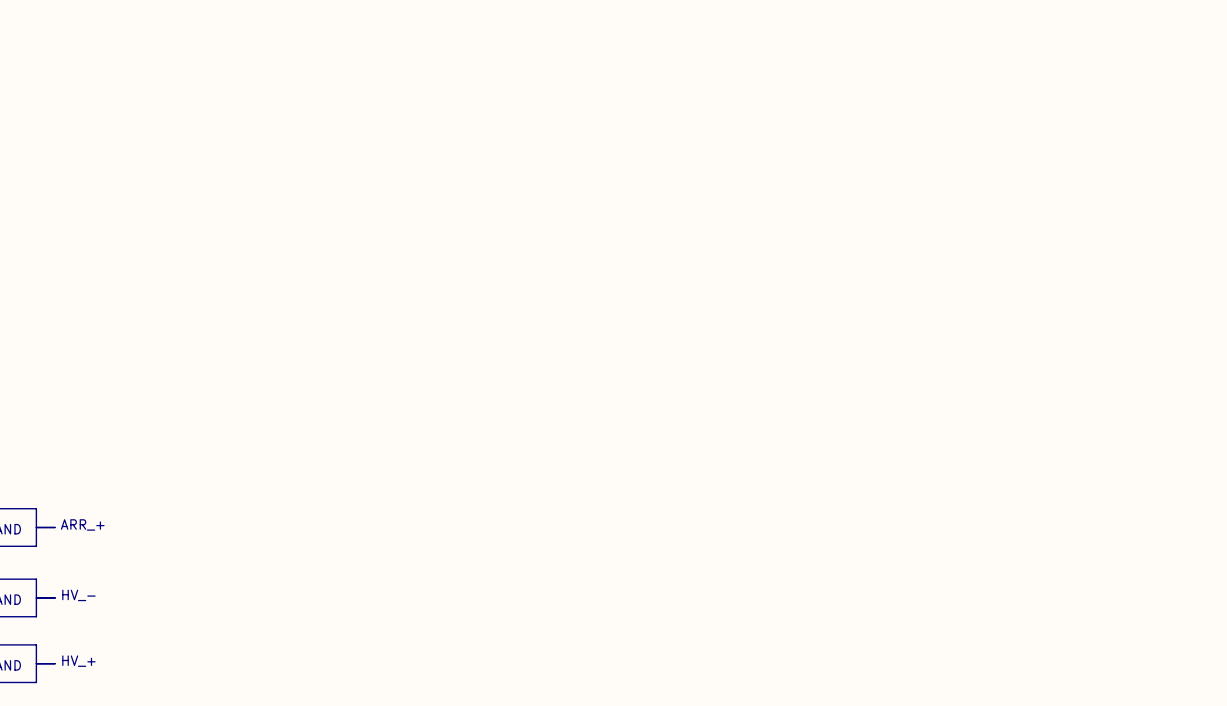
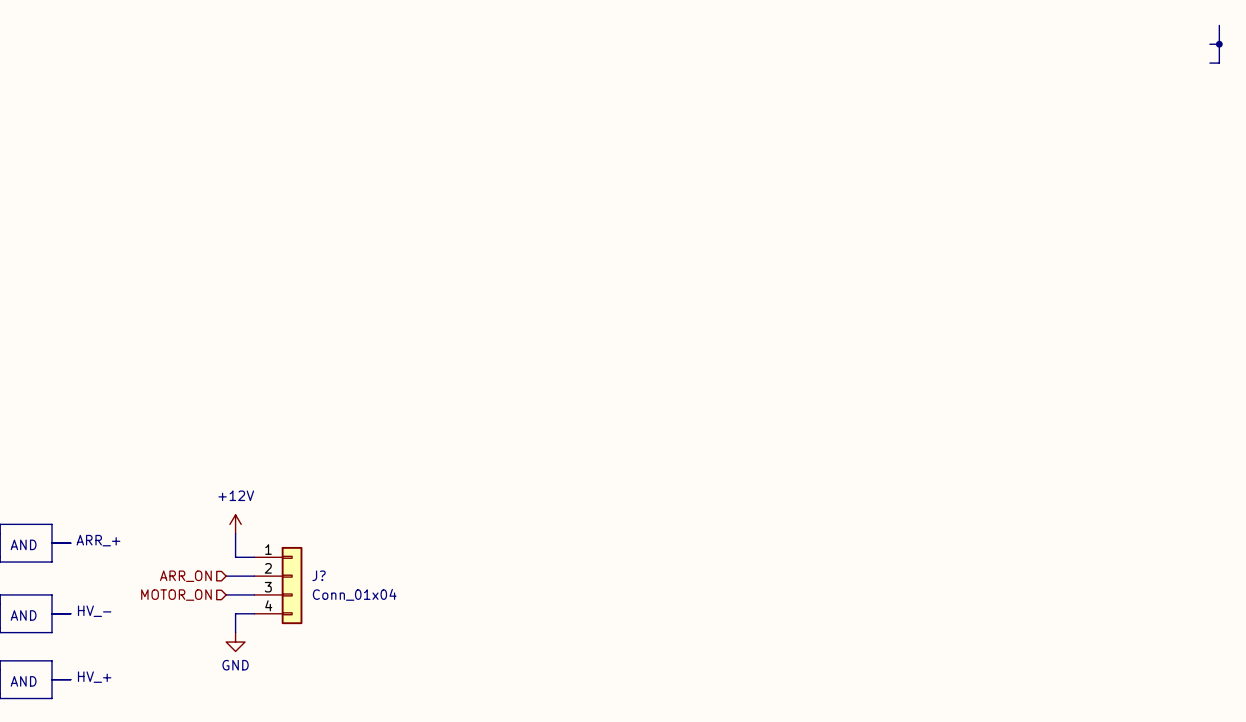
wire: none -> (1219, 25) (1219, 63) (1209, 63)
wire: none -> (1209, 44) (1219, 44)
junction: none -> (1219, 44)
power symbol: none -> +12V (235, 524)
wire: none -> (235, 533) (235, 557) (254, 557)
hierarchical label: none -> ARR_ON (185, 576)
wire: none -> (226, 576) (254, 576)
J?: none -> Conn_01x04 (278, 585)
hierarchical label: none -> MOTOR_ON (176, 595)
wire: none -> (226, 594) (254, 594)
wire: none -> (254, 613) (235, 613) (235, 632)
power symbol: none -> GND (235, 642)

